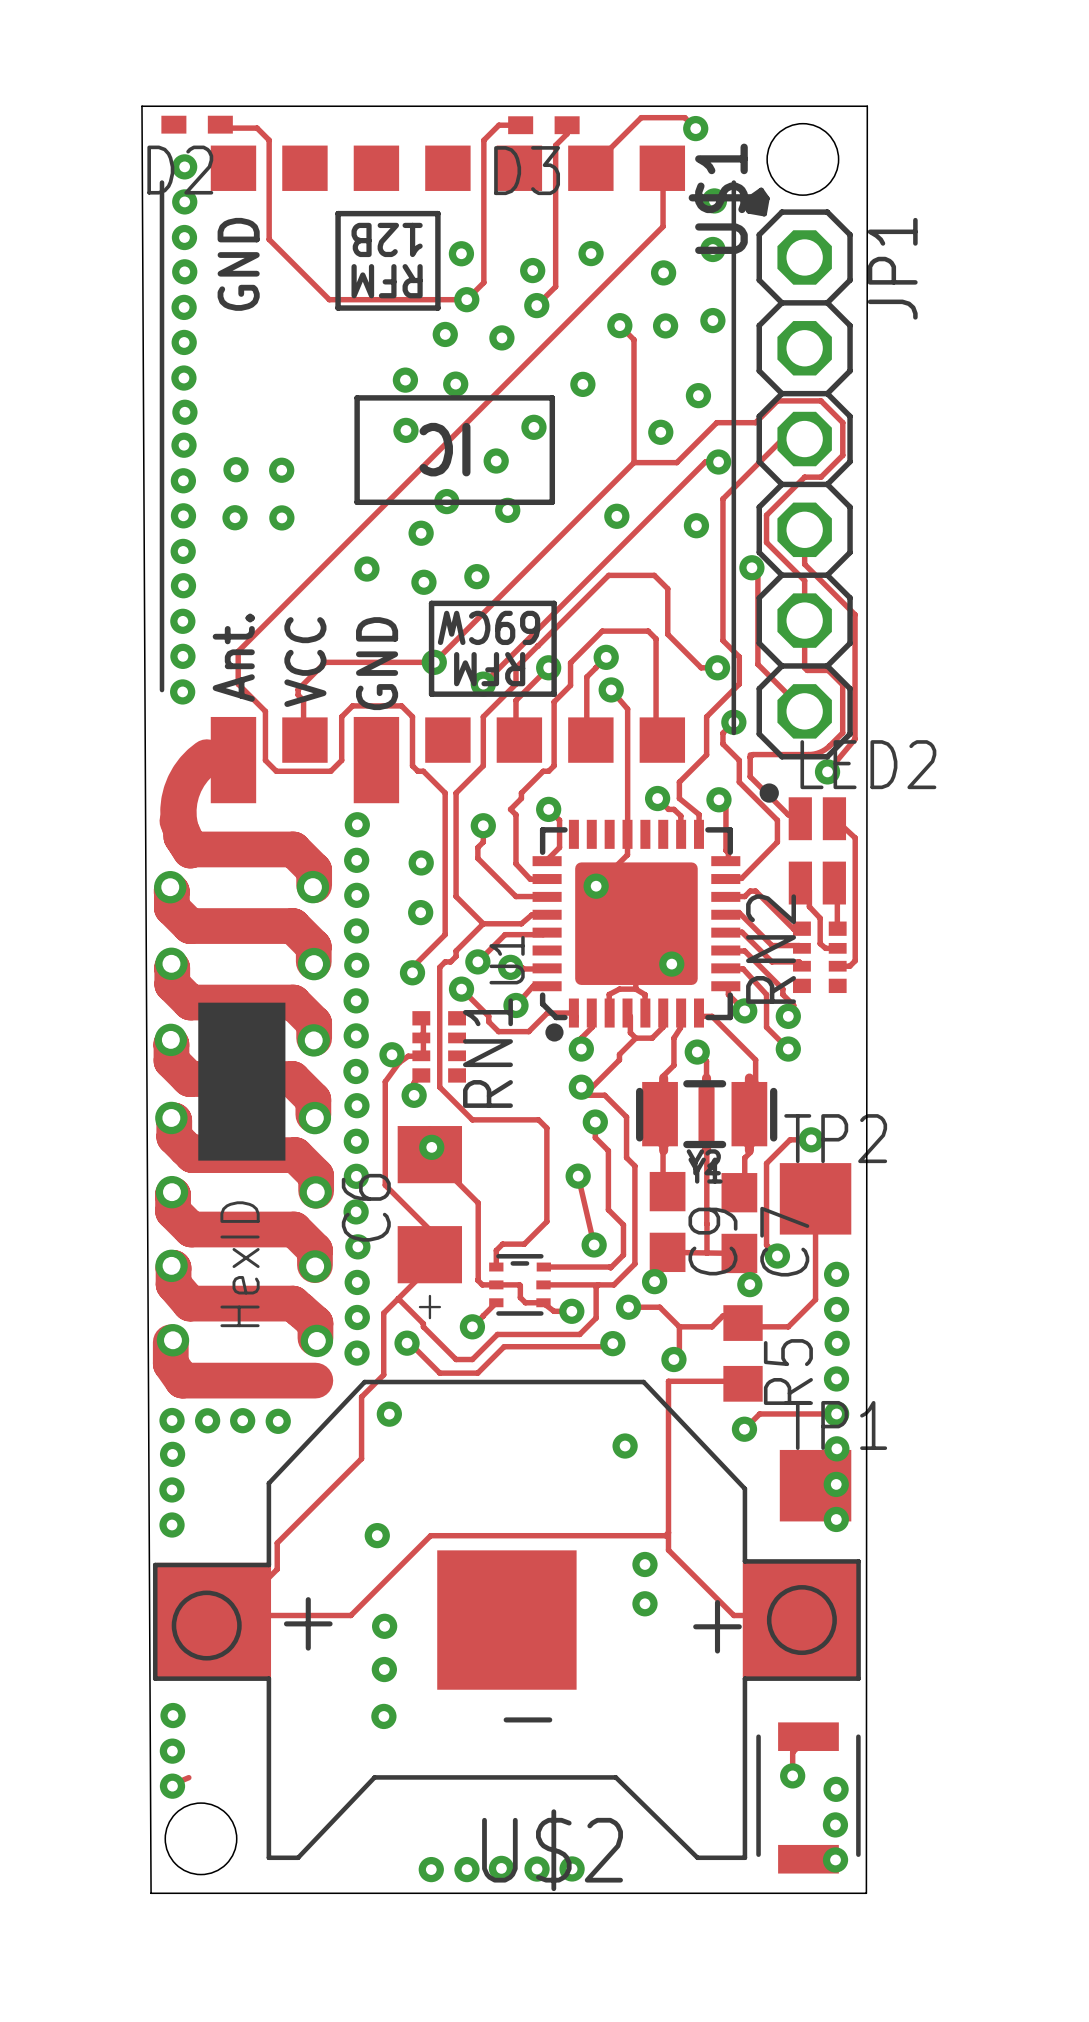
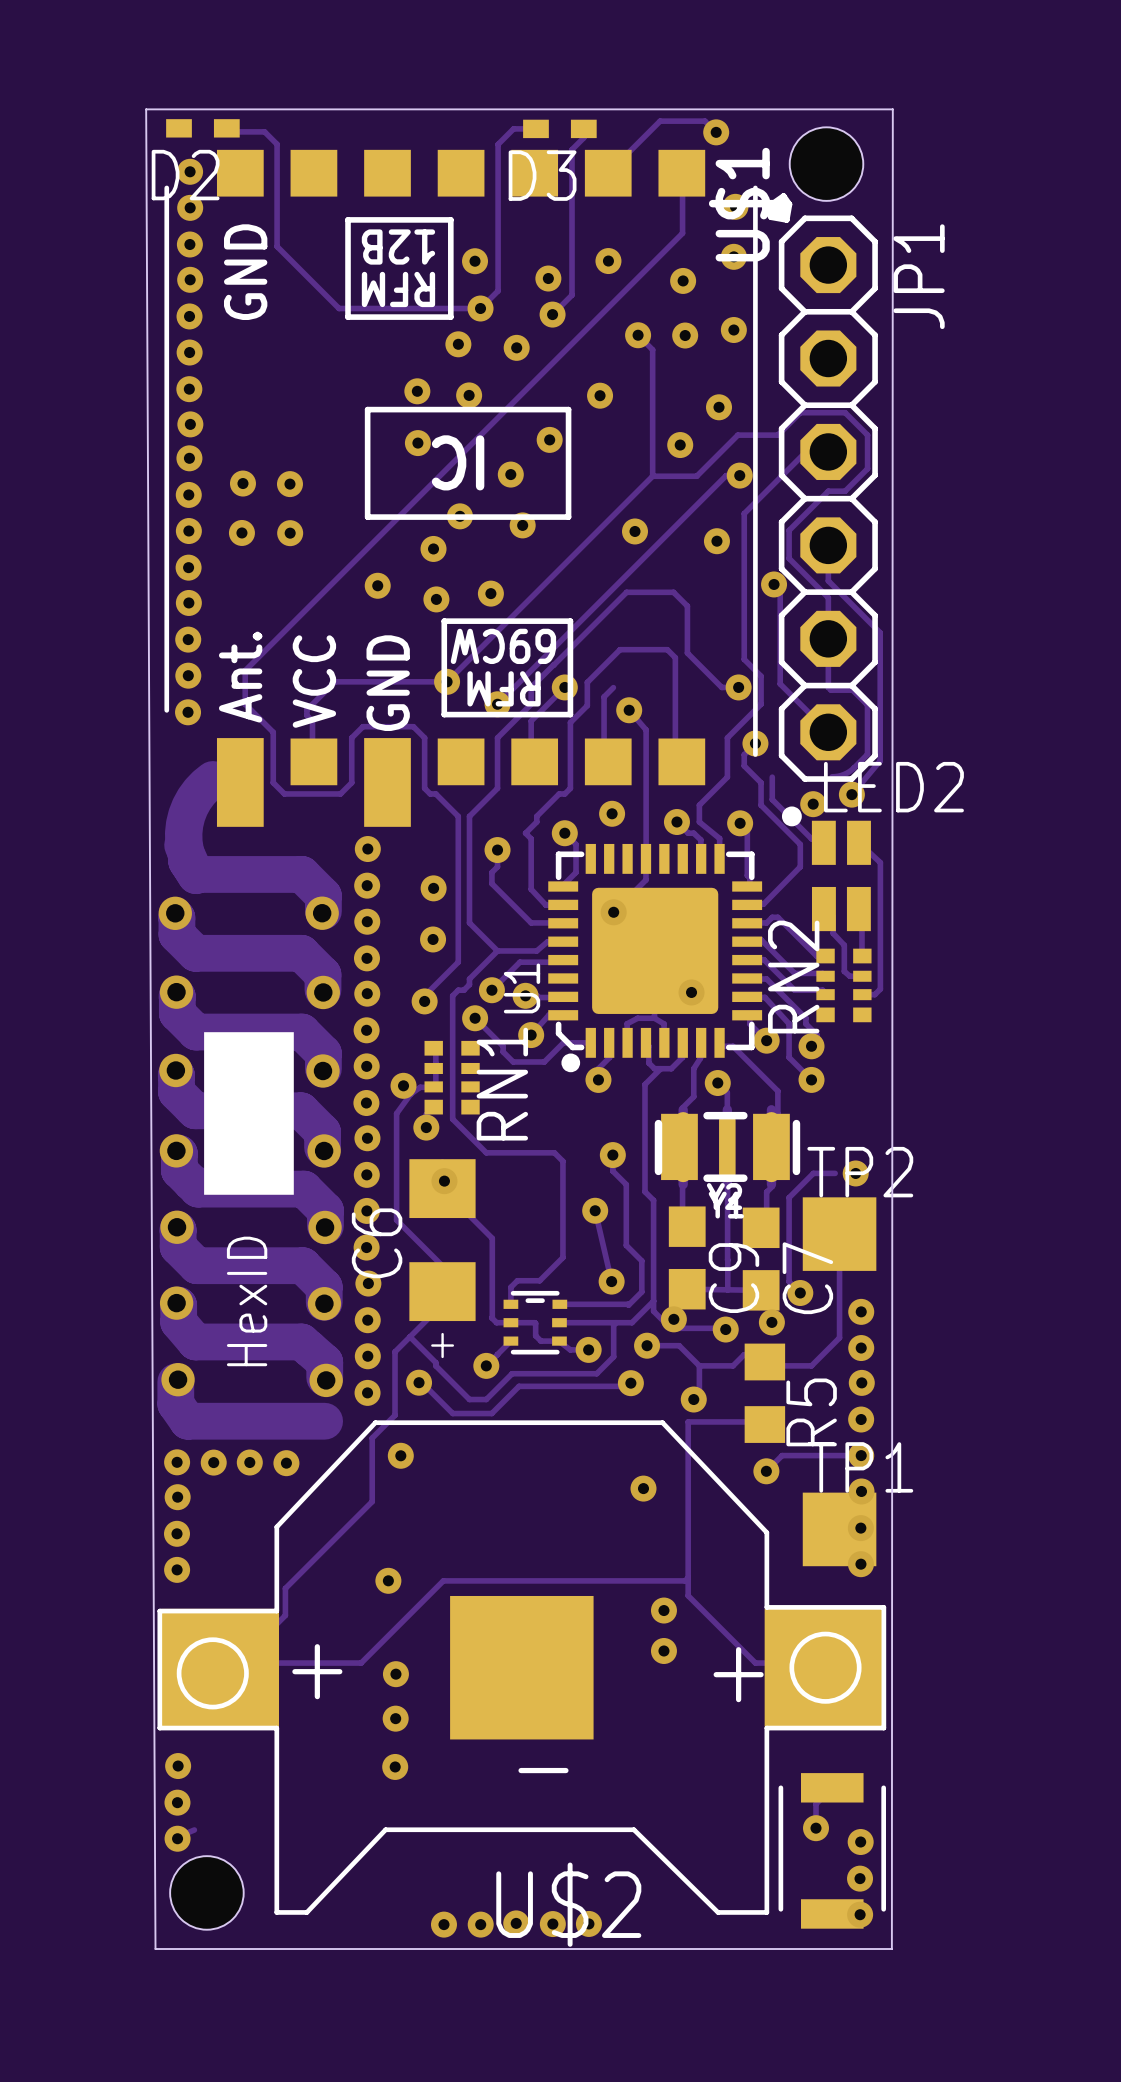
via: (606, 657) -> none
track: (808, 754) (752, 754) (750, 757) -> none
via: none -> (813, 804)
via: none -> (612, 813)
track: (635, 1038) (619, 1054) (619, 1059) (586, 1092) -> none
track: (581, 1087) (589, 1095) (604, 1095) (626, 1117) -> (660, 1068) (644, 1084) (644, 1149)
via: (581, 1087) -> none
via position: (811, 1139) -> (855, 1173)
track: none -> (653, 1301) (653, 1311) (670, 1328) (725, 1329)
via: none -> (725, 1329)

